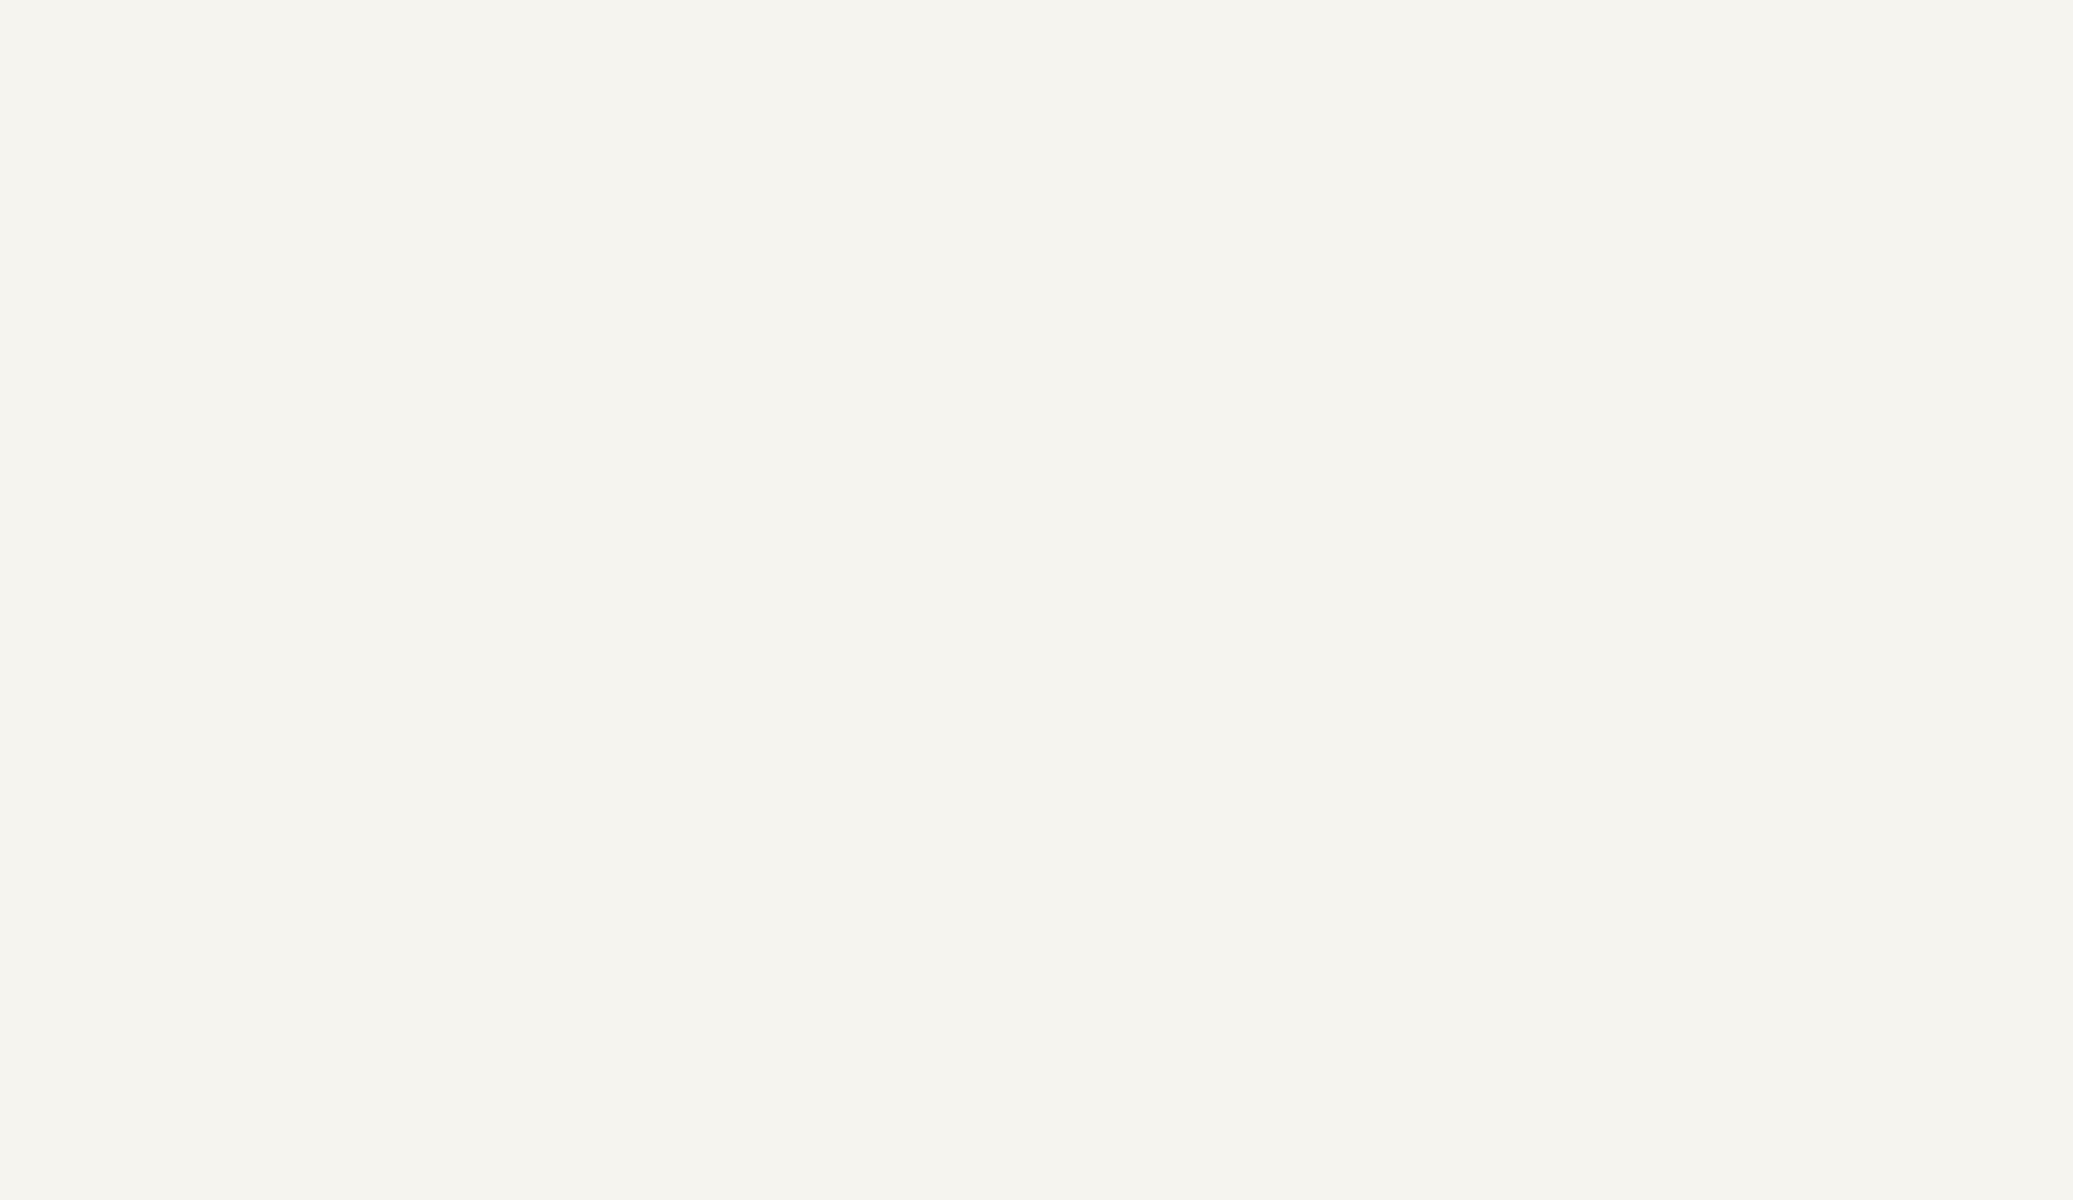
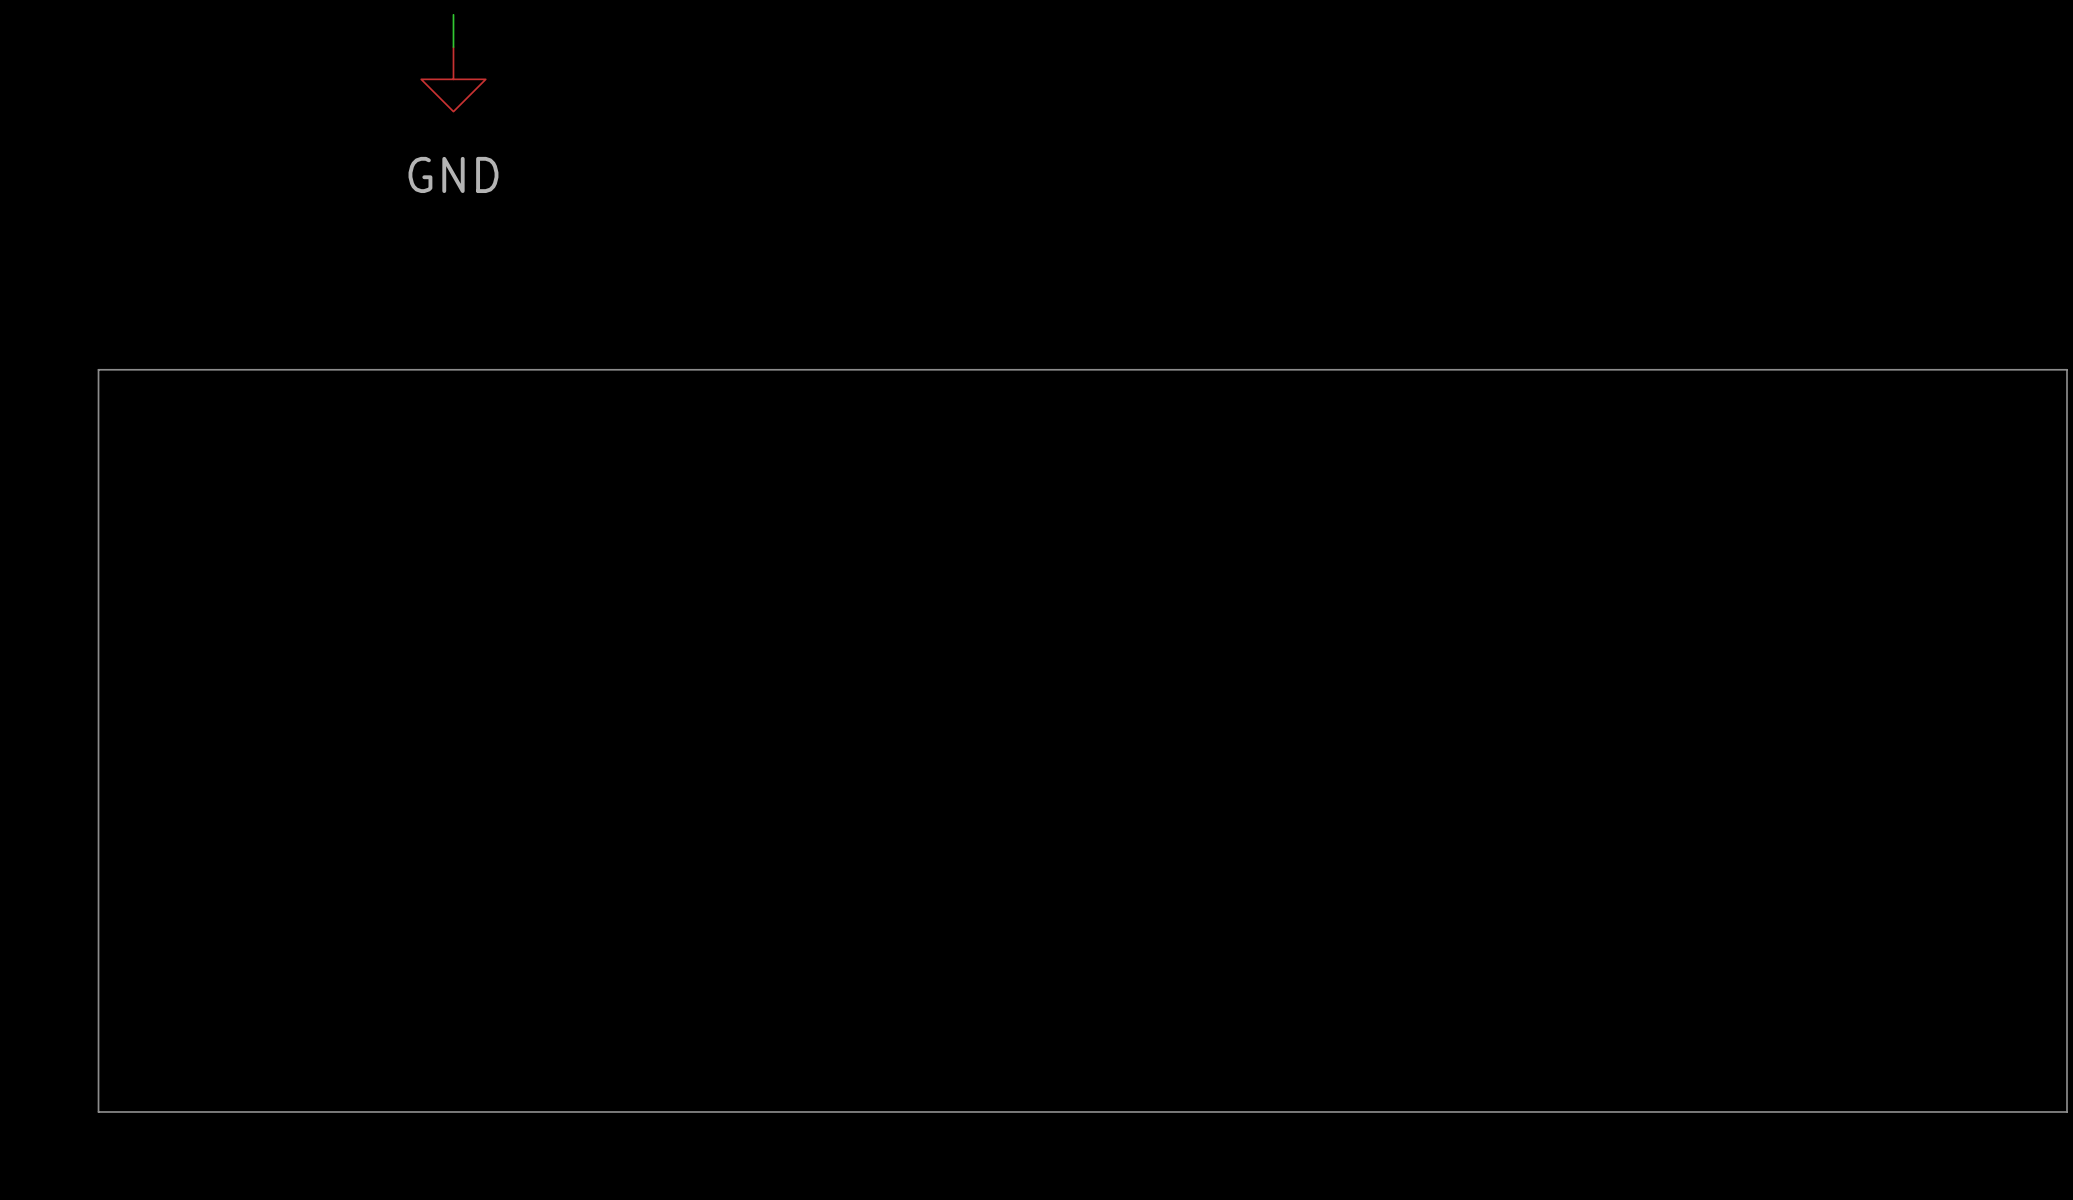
wire: none -> (453, 14) (453, 47)
power symbol: none -> GND (453, 79)
line: none -> (98, 369) (2066, 369) (2066, 1111) (98, 1111) (98, 369)

